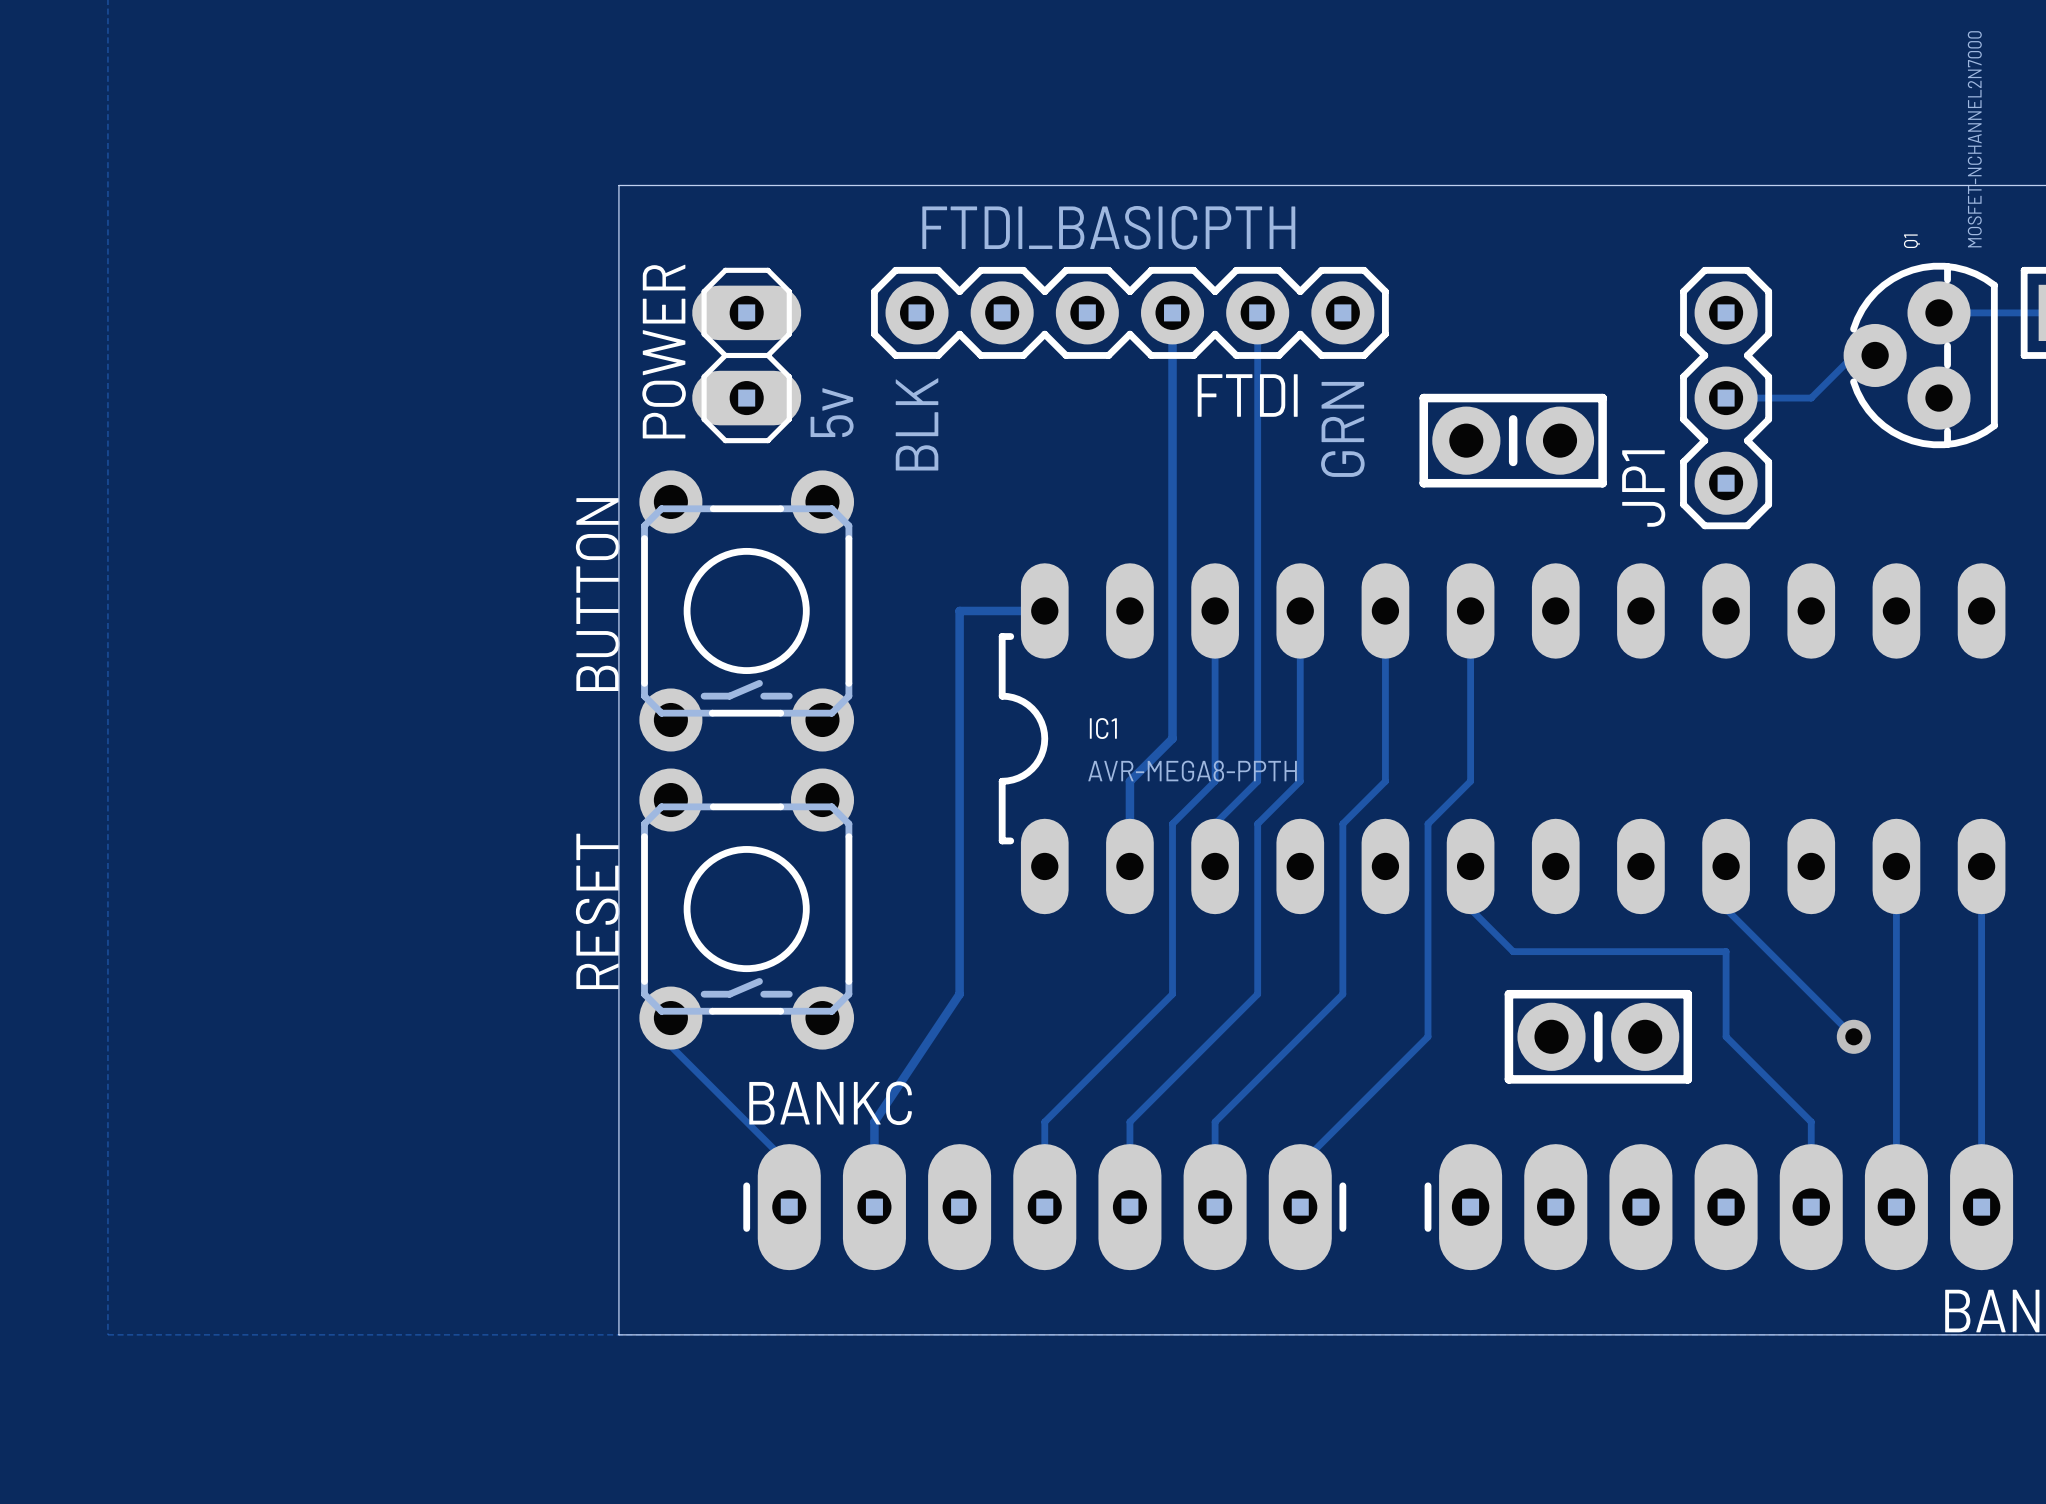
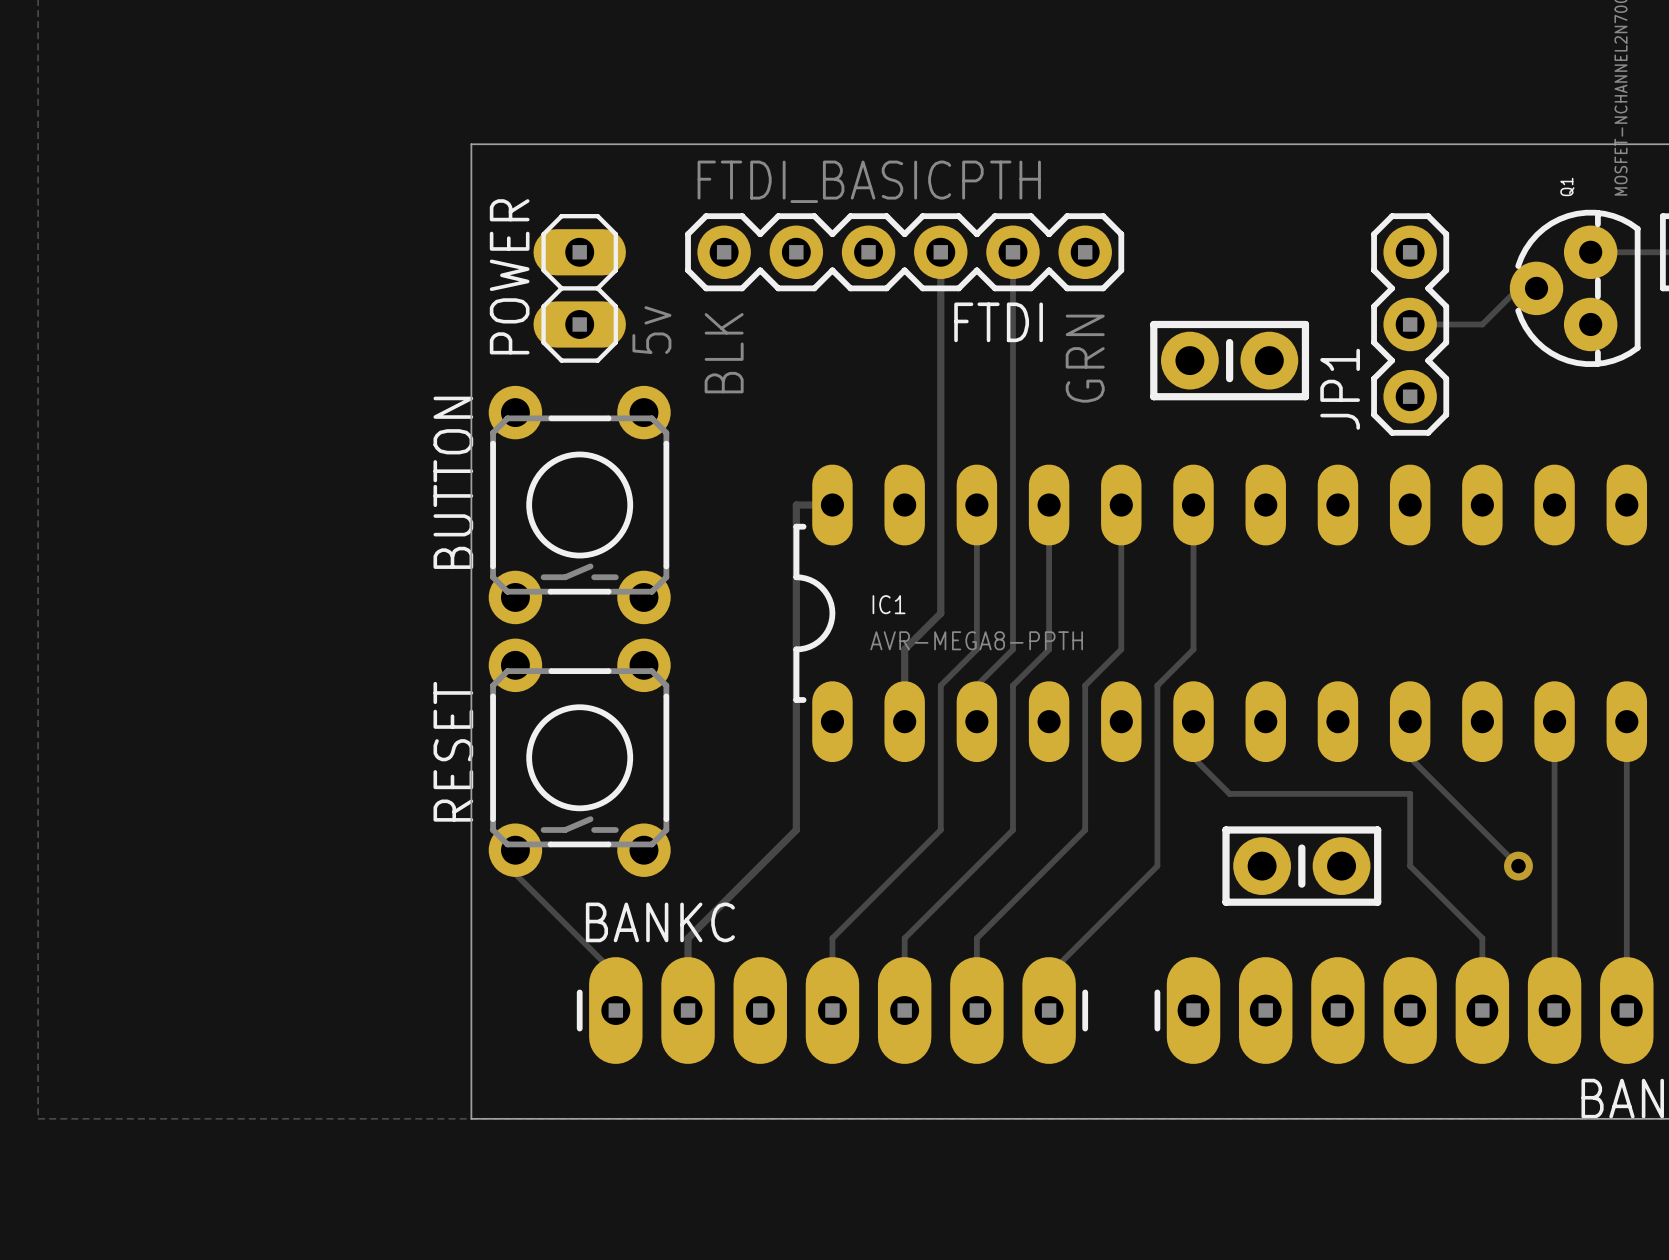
track: (1002, 610) (959, 610) (959, 994) (874, 1121) -> (796, 505) (796, 829) (688, 938)

